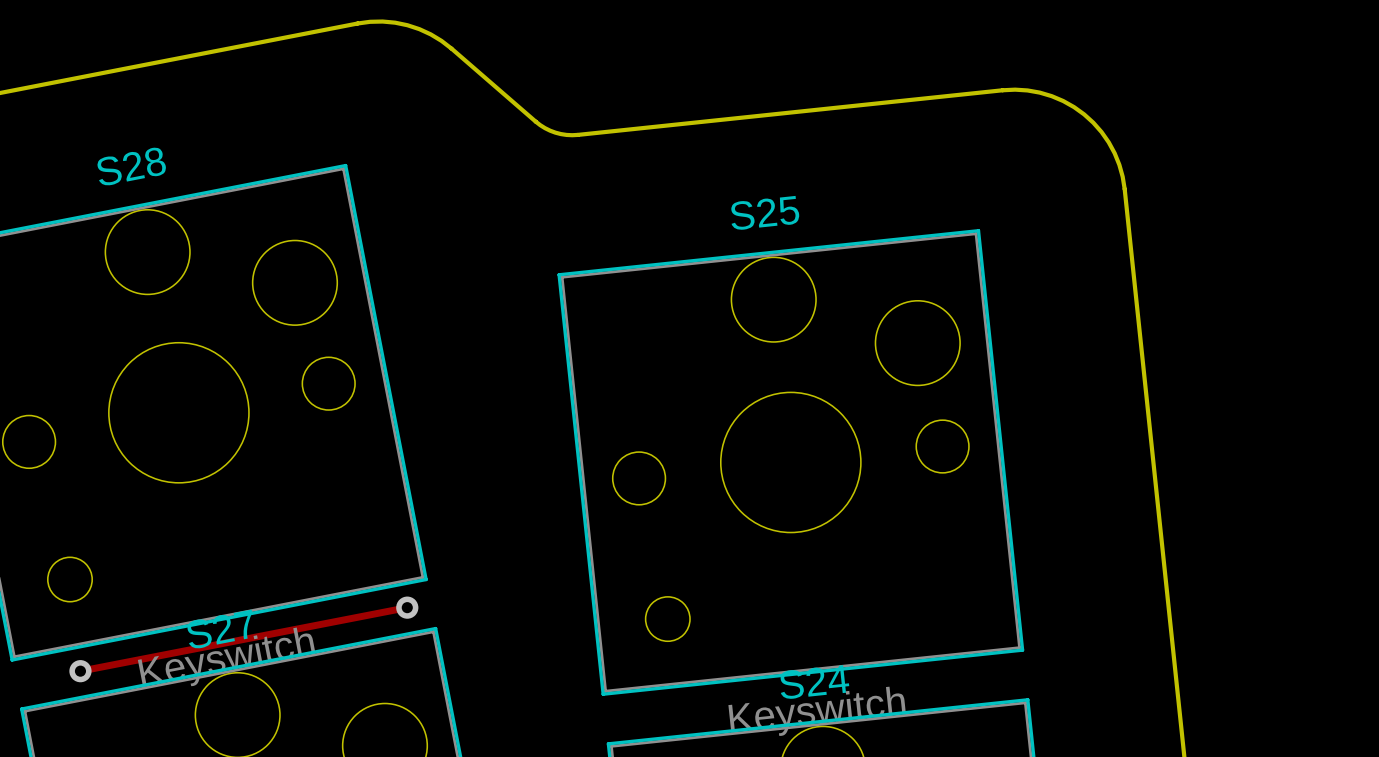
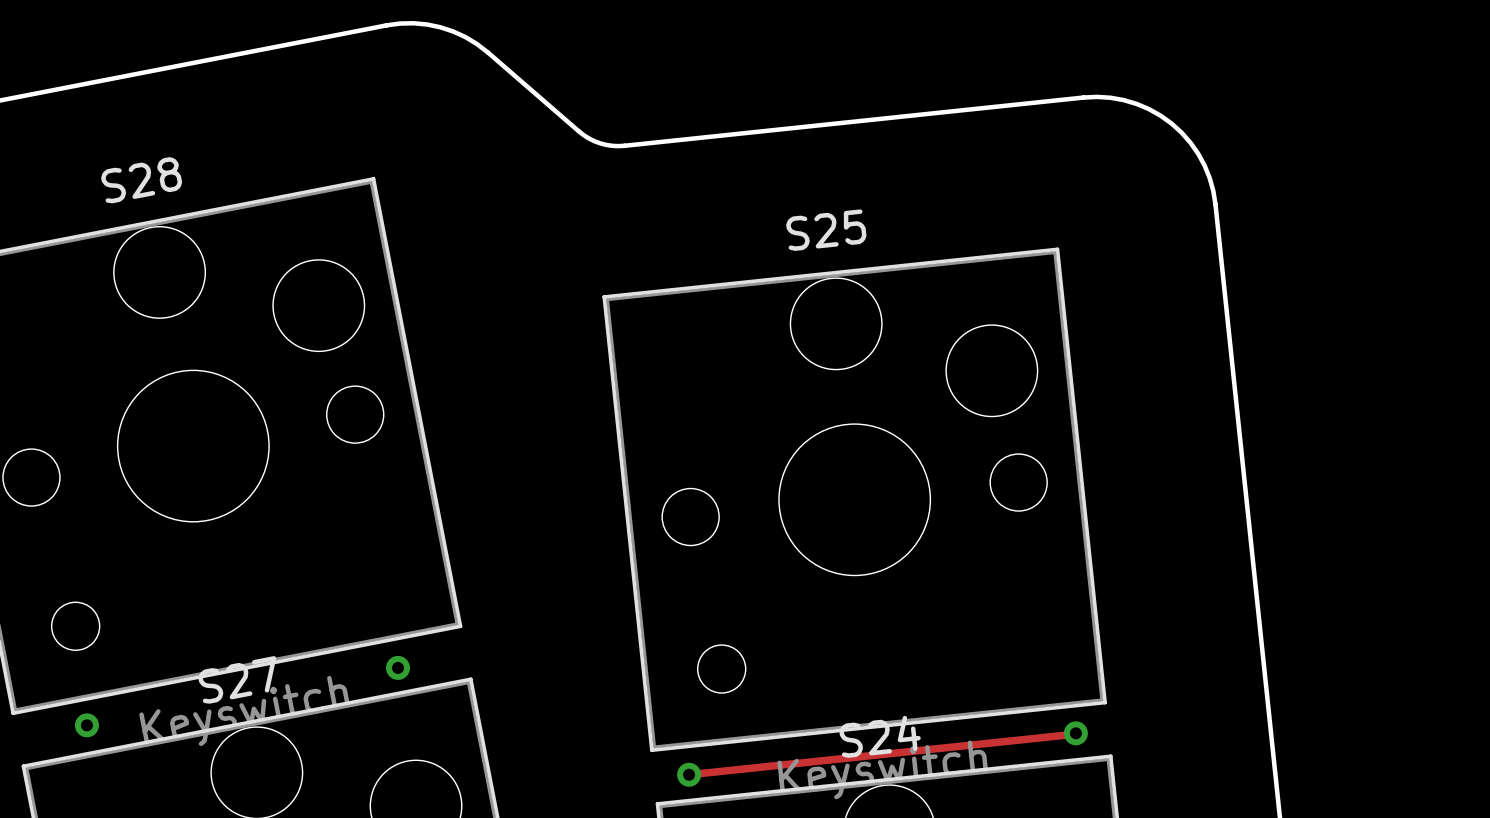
track: (407, 607) (80, 671) -> none
via position: (407, 607) -> (398, 667)
track: none -> (1075, 733) (689, 774)
via: none -> (1075, 733)
via: none -> (689, 774)

